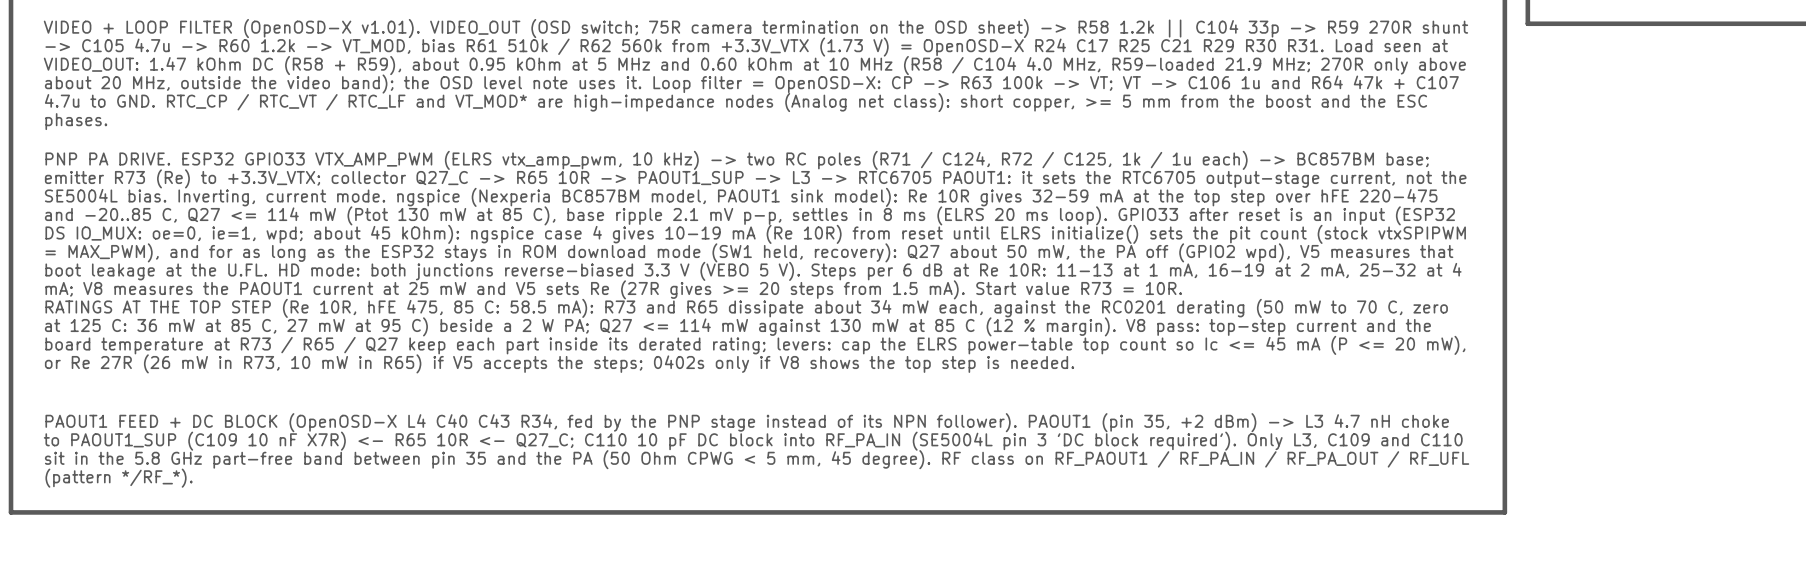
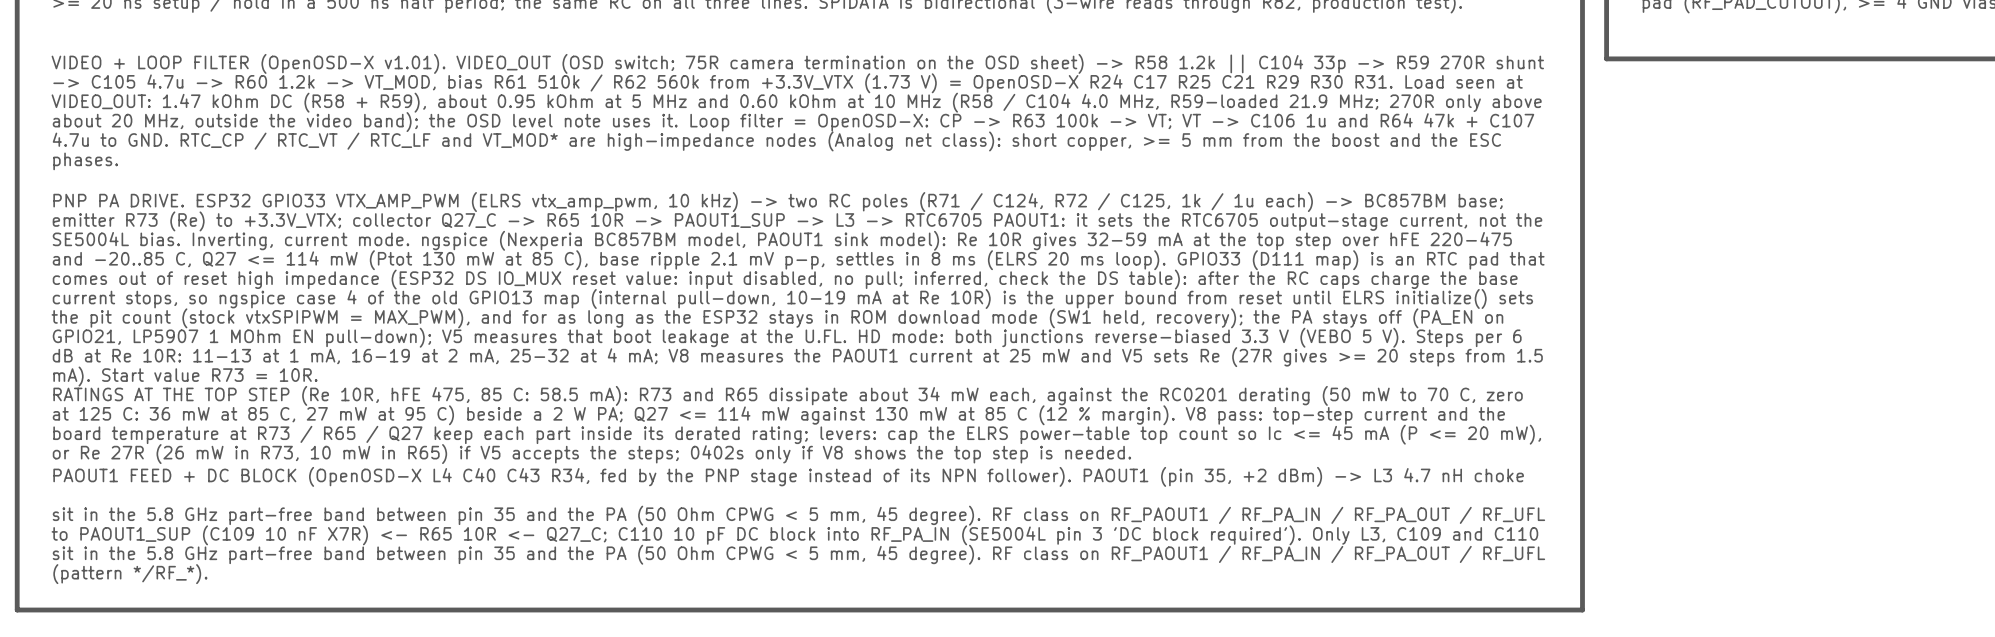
text: and -20..85 C, Q27 <= 114 mW (Ptot 130 mW at 85 C), base ripple 2.1 mV p-p, settles in 8 ms (ELRS 20 ms loop). GPIO33 after reset is an input (ESP32 (749, 215) -> and -20..85 C, Q27 <= 114 mW (Ptot 130 mW at 85 C), base ripple 2.1 mV p-p, settles in 8 ms (ELRS 20 ms loop). GPIO33 (D111 map) is an RTC pad that (798, 260)
text: DS IO_MUX: oe=0, ie=1, wpd; about 45 kOhm): ngspice case 4 gives 10-19 mA (Re 10R) from reset until ELRS initialize() sets the pit count (stock vtxSPIPWM (755, 234) -> comes out of reset high impedance (ESP32 DS IO_MUX reset value: input disabled, no pull; inferred, check the DS table): after the RC caps charge the base (785, 279)
text: = MAX_PWM), and for as long as the ESP32 stays in ROM download mode (SW1 held, recovery): Q27 about 50 mW, the PA off (GPIO2 wpd), V5 measures that (749, 252) -> current stops, so ngspice case 4 of the old GPIO13 map (internal pull-down, 10-19 mA at Re 10R) is the upper bound from reset until ELRS initialize() sets (792, 298)
text: boot leakage at the U.FL. HD mode: both junctions reverse-biased 3.3 V (VEBO 5 V). Steps per 6 dB at Re 10R: 11-13 at 1 mA, 16-19 at 2 mA, 25-32 at 4 (753, 271) -> the pit count (stock vtxSPIPWM = MAX_PWM), and for as long as the ESP32 stays in ROM download mode (SW1 held, recovery); the PA stays off (PA_EN on (777, 318)
text: mA; V8 measures the PAOUT1 current at 25 mW and V5 sets Re (27R gives >= 20 steps from 1.5 mA). Start value R73 = 10R. (613, 289) -> GPIO21, LP5907 1 MOhm EN pull-down); V5 measures that boot leakage at the U.FL. HD mode: both junctions reverse-biased 3.3 V (VEBO 5 V). Steps per 6 (787, 337)
text: RATINGS AT THE TOP STEP (Re 10R, hFE 475, 85 C: 58.5 mA): R73 and R65 dissipate about 34 mW each, against the RC0201 derating (50 mW to 70 C, zero (746, 308) -> dB at Re 10R: 11-13 at 1 mA, 16-19 at 2 mA, 25-32 at 4 mA; V8 measures the PAOUT1 current at 25 mW and V5 sets Re (27R gives >= 20 steps from 1.5 (797, 357)
text: at 125 C: 36 mW at 85 C, 27 mW at 95 C) beside a 2 W PA; Q27 <= 114 mW against 130 mW at 85 C (12 % margin). V8 pass: top-step current and the (737, 326) -> mA). Start value R73 = 10R. (185, 376)
text: board temperature at R73 / R65 / Q27 keep each part inside its derated rating; levers: cap the ELRS power-table top count so Ic <= 45 mA (P <= 20 mW), (755, 345) -> RATINGS AT THE TOP STEP (Re 10R, hFE 475, 85 C: 58.5 mA): R73 and R65 dissipate about 34 mW each, against the RC0201 derating (50 mW to 70 C, zero (788, 395)
text: or Re 27R (26 mW in R73, 10 mW in R65) if V5 accepts the steps; 0402s only if V8 shows the top step is needed. (559, 363) -> at 125 C: 36 mW at 85 C, 27 mW at 95 C) beside a 2 W PA; Q27 <= 114 mW against 130 mW at 85 C (12 % margin). V8 pass: top-step current and the (778, 415)
text: none -> board temperature at R73 / R65 / Q27 keep each part inside its derated rating; levers: cap the ELRS power-table top count so Ic <= 45 mA (P <= 20 mW), (797, 434)
text: none -> or Re 27R (26 mW in R73, 10 mW in R65) if V5 accepts the steps; 0402s only if V8 shows the top step is needed. (591, 454)
text: to PAOUT1_SUP (C109 10 nF X7R) <- R65 10R <- Q27_C; C110 10 pF DC block into RF_PA_IN (SE5004L pin 3 'DC block required'). Only L3, C109 and C110 (753, 441) -> none
text: (pattern */RF_*). (119, 478) -> to PAOUT1_SUP (C109 10 nF X7R) <- R65 10R <- Q27_C; C110 10 pF DC block into RF_PA_IN (SE5004L pin 3 'DC block required'). Only L3, C109 and C110 (794, 535)
text: none -> sit in the 5.8 GHz part-free band between pin 35 and the PA (50 Ohm CPWG < 5 mm, 45 degree). RF class on RF_PAOUT1 / RF_PA_IN / RF_PA_OUT / RF_UFL (798, 554)
line: (11, 512) (1504, 512) -> (17, 570) (17, 610) (1582, 610) (1582, 570)
text: none -> (pattern */RF_*). (130, 574)

